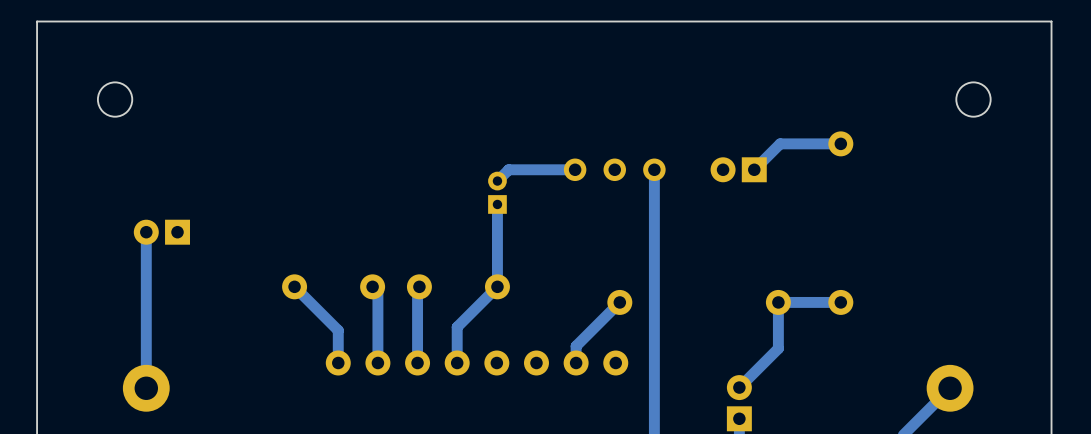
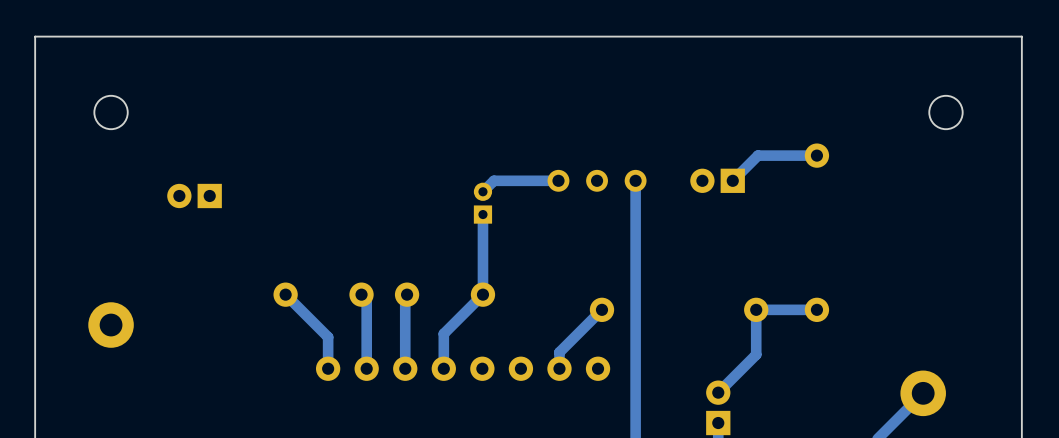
track: (146, 232) (146, 388) -> none
part position: (161, 232) -> (194, 195)
part position: (146, 388) -> (111, 325)

